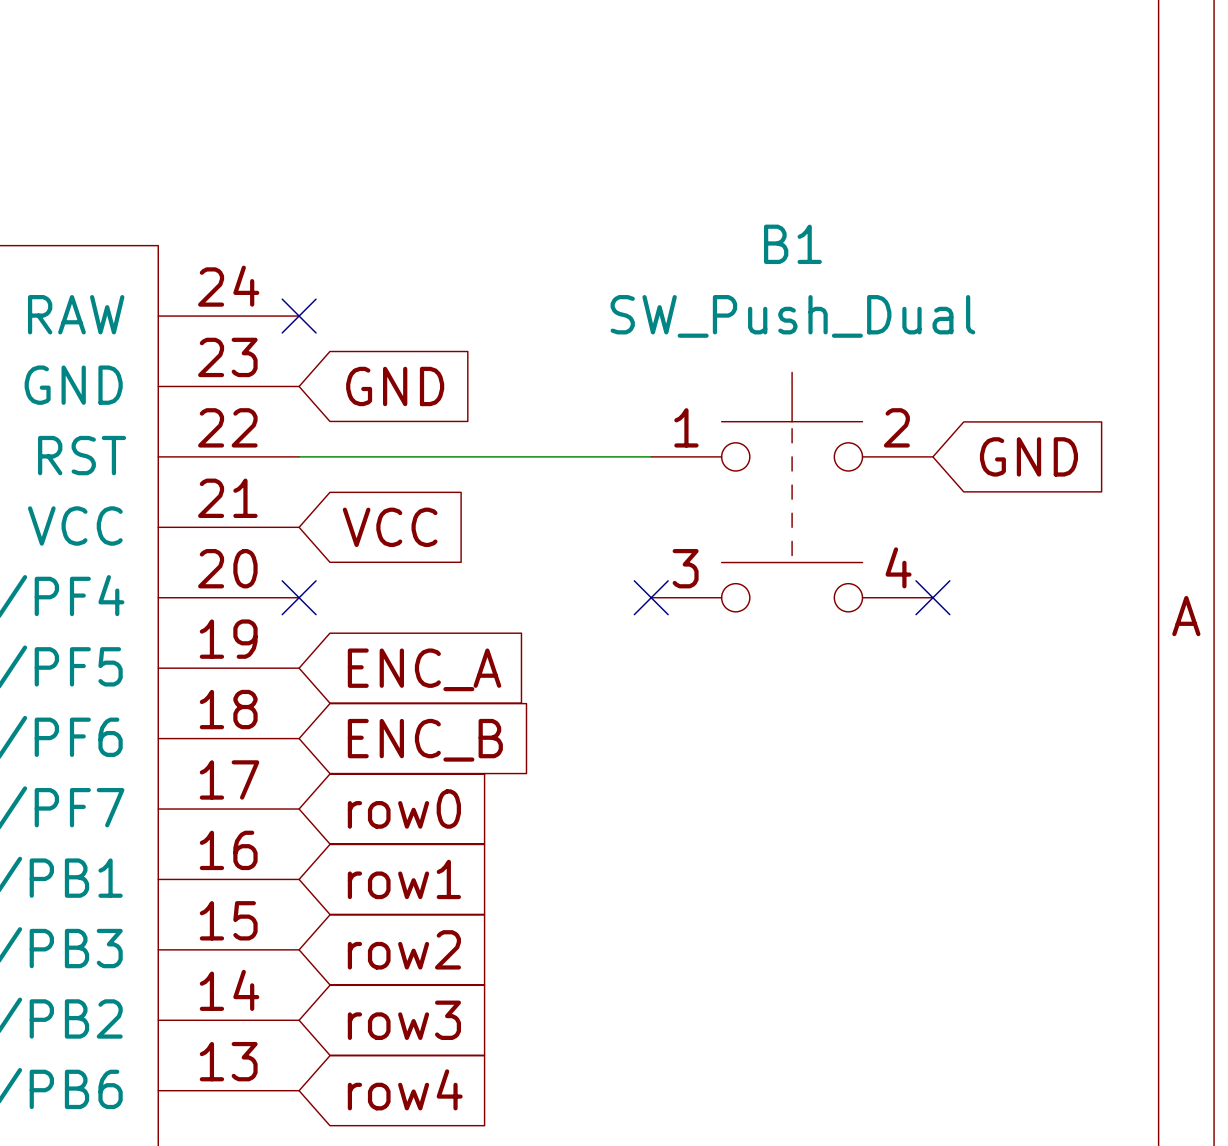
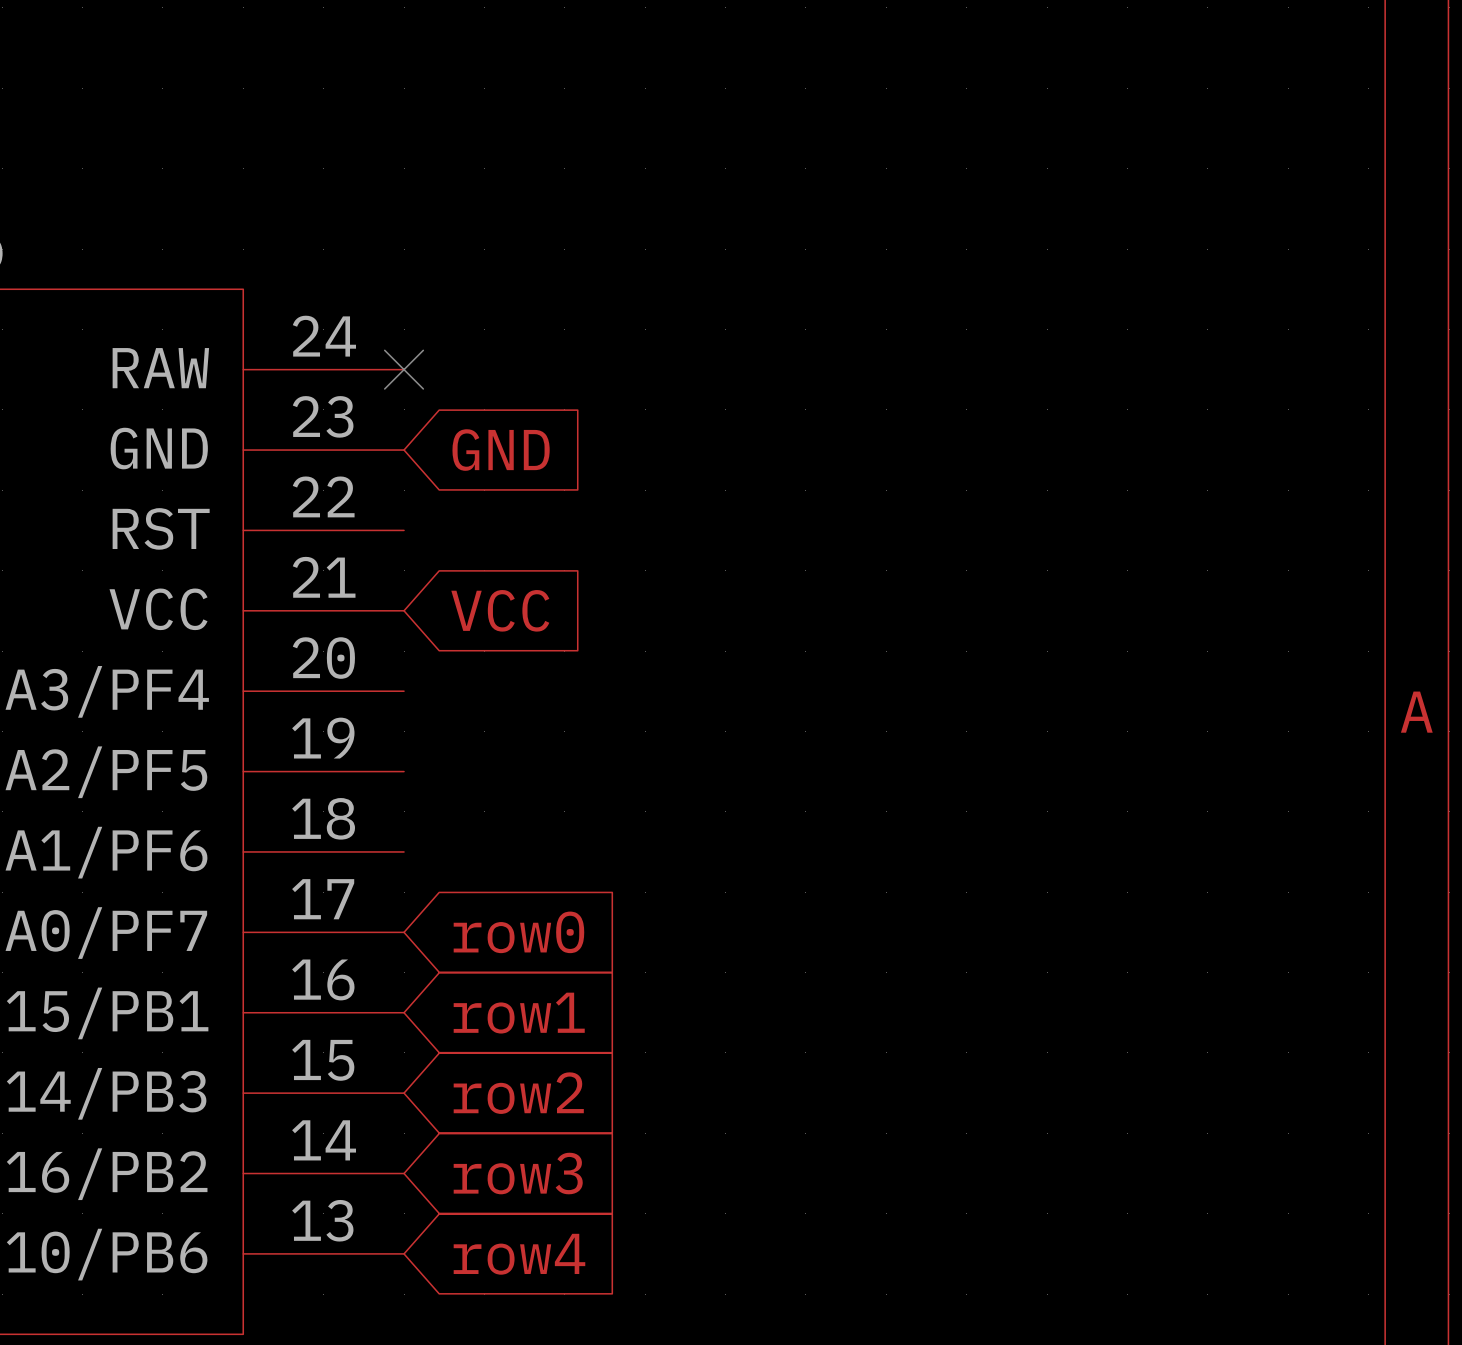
wire: (299, 456) (651, 456) -> none
global label: GND (1028, 456) -> none
B1: SW_Push_Dual (792, 492) -> none
no-connect mark: (299, 597) -> none
no-connect mark: (651, 597) -> none
no-connect mark: (932, 597) -> none
global label: ENC_A (424, 669) -> none
global label: ENC_B (425, 740) -> none

